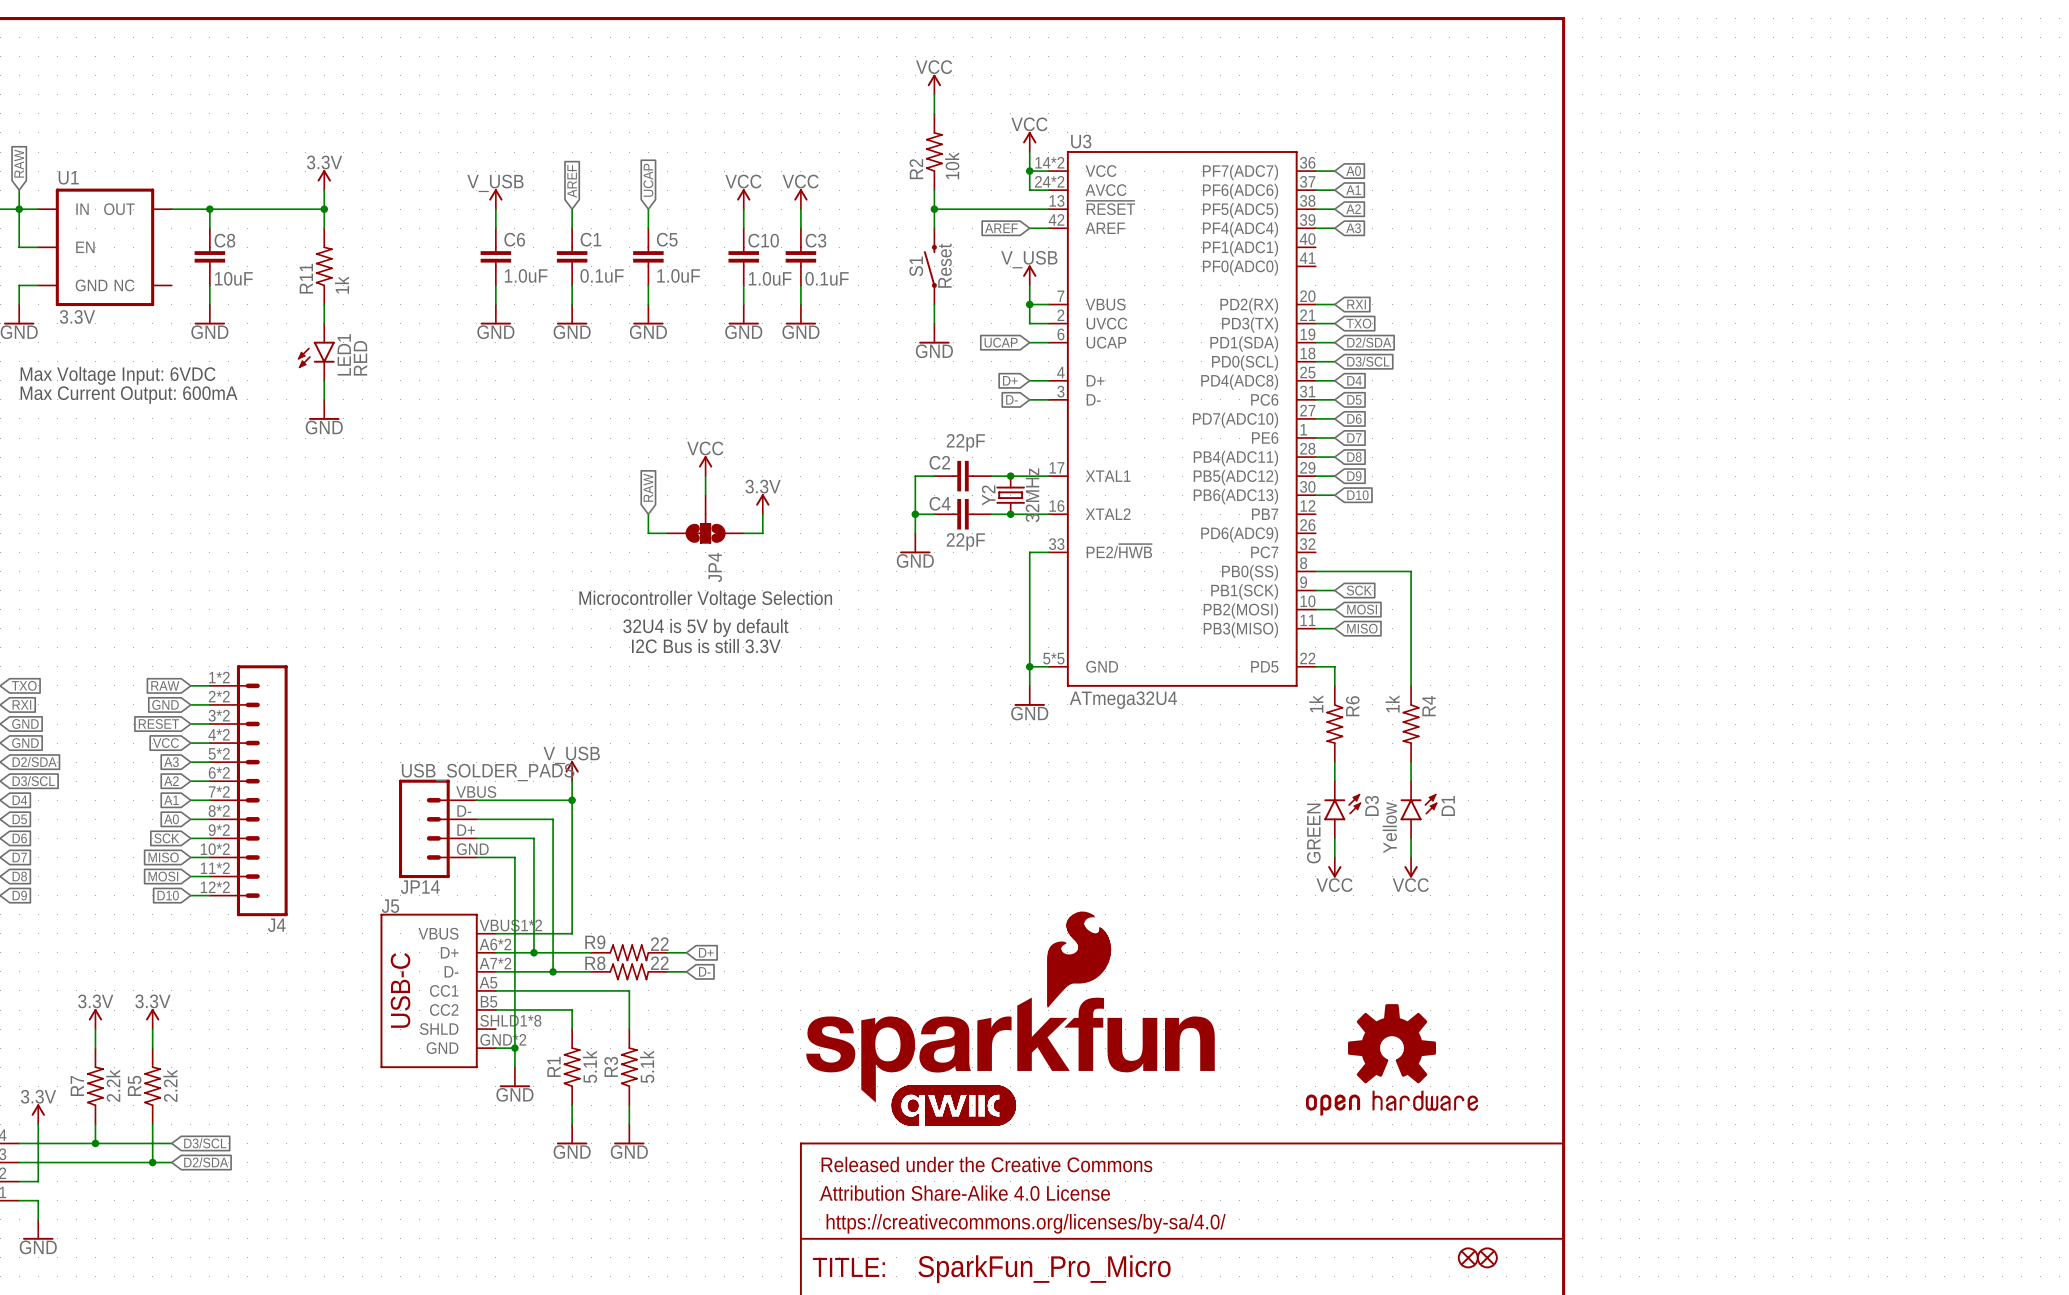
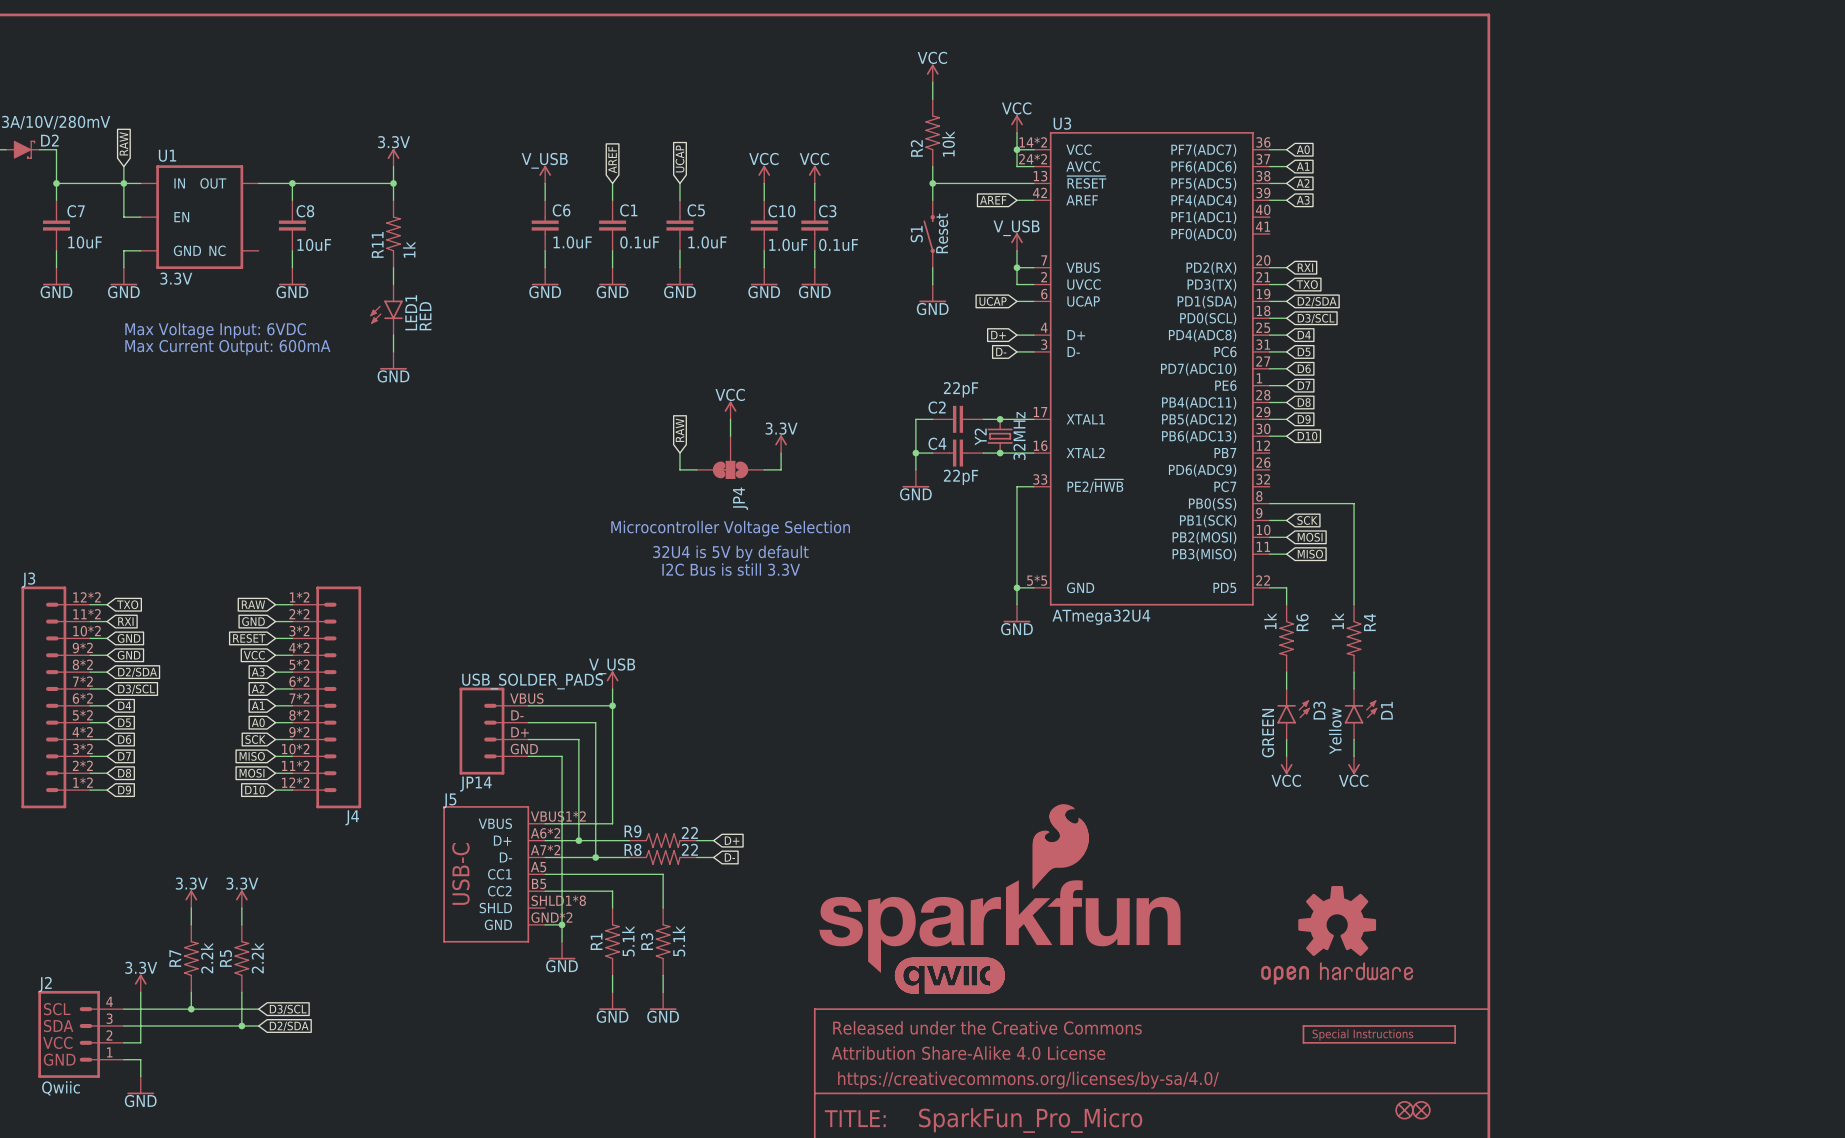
part: none -> (1379, 1034)

